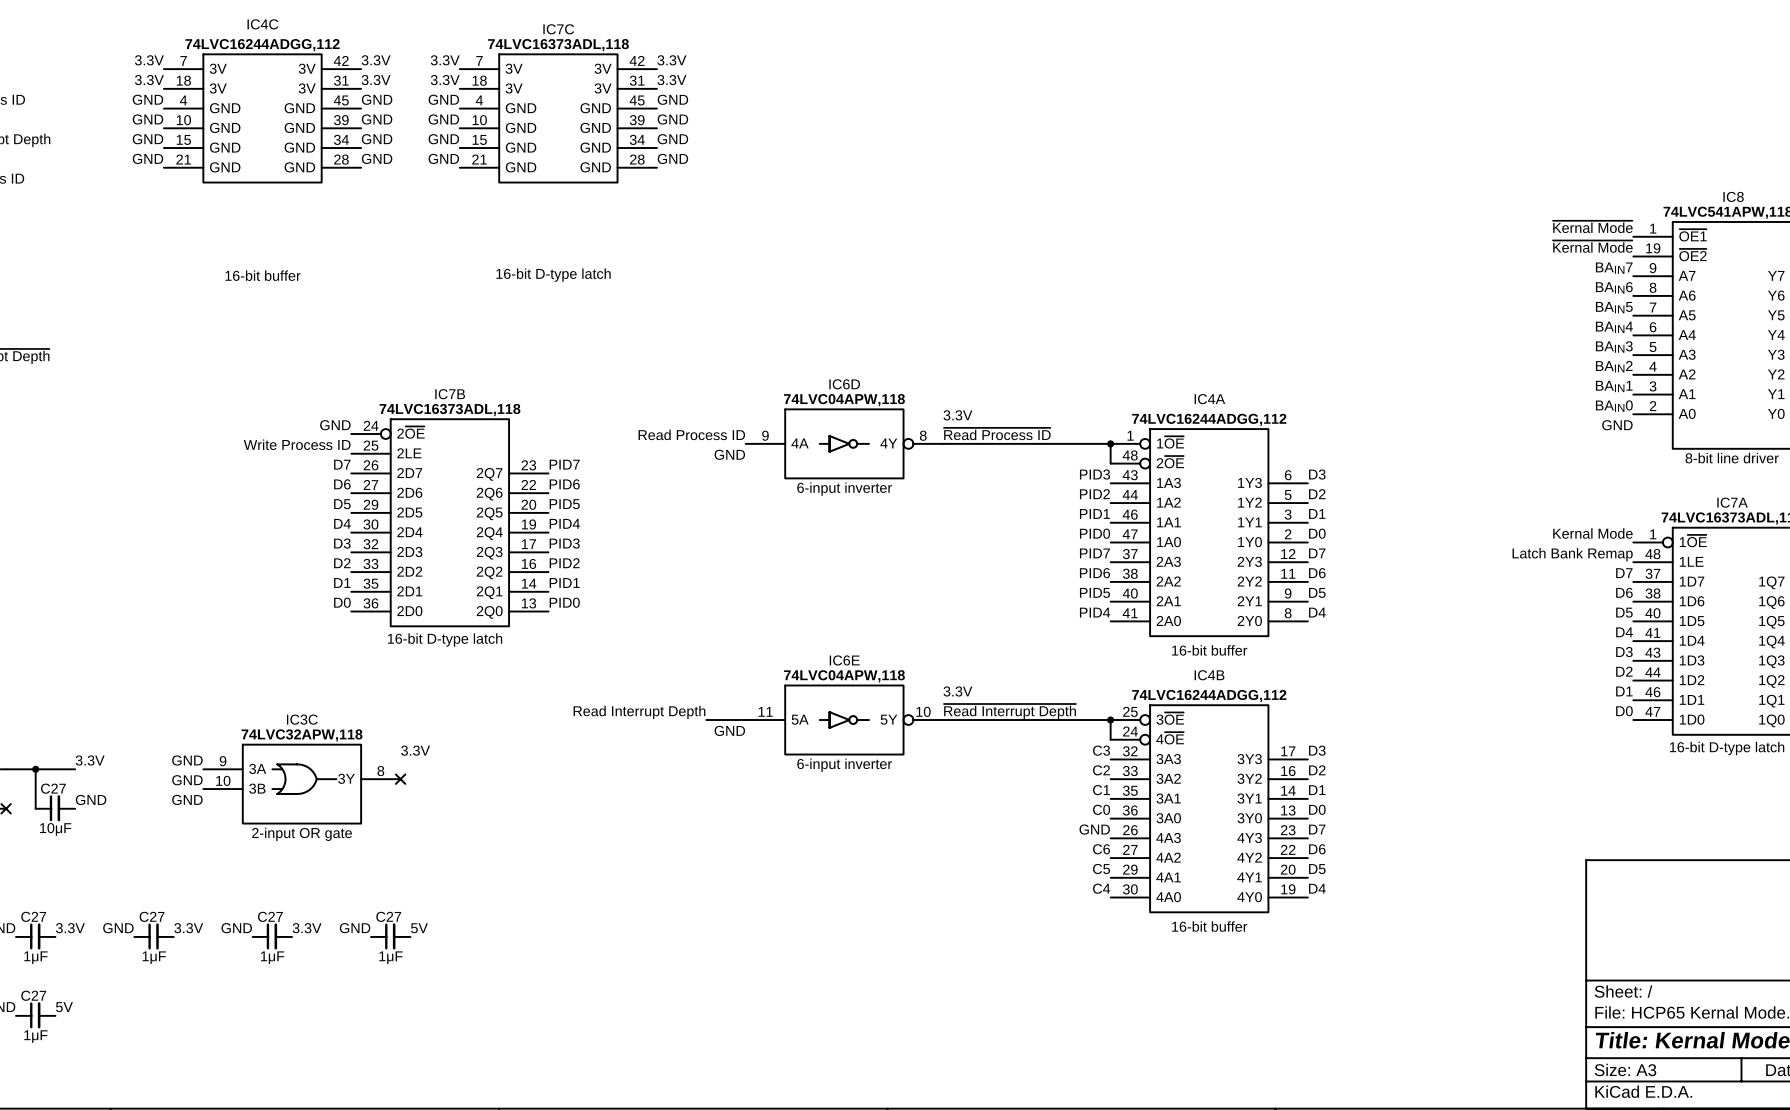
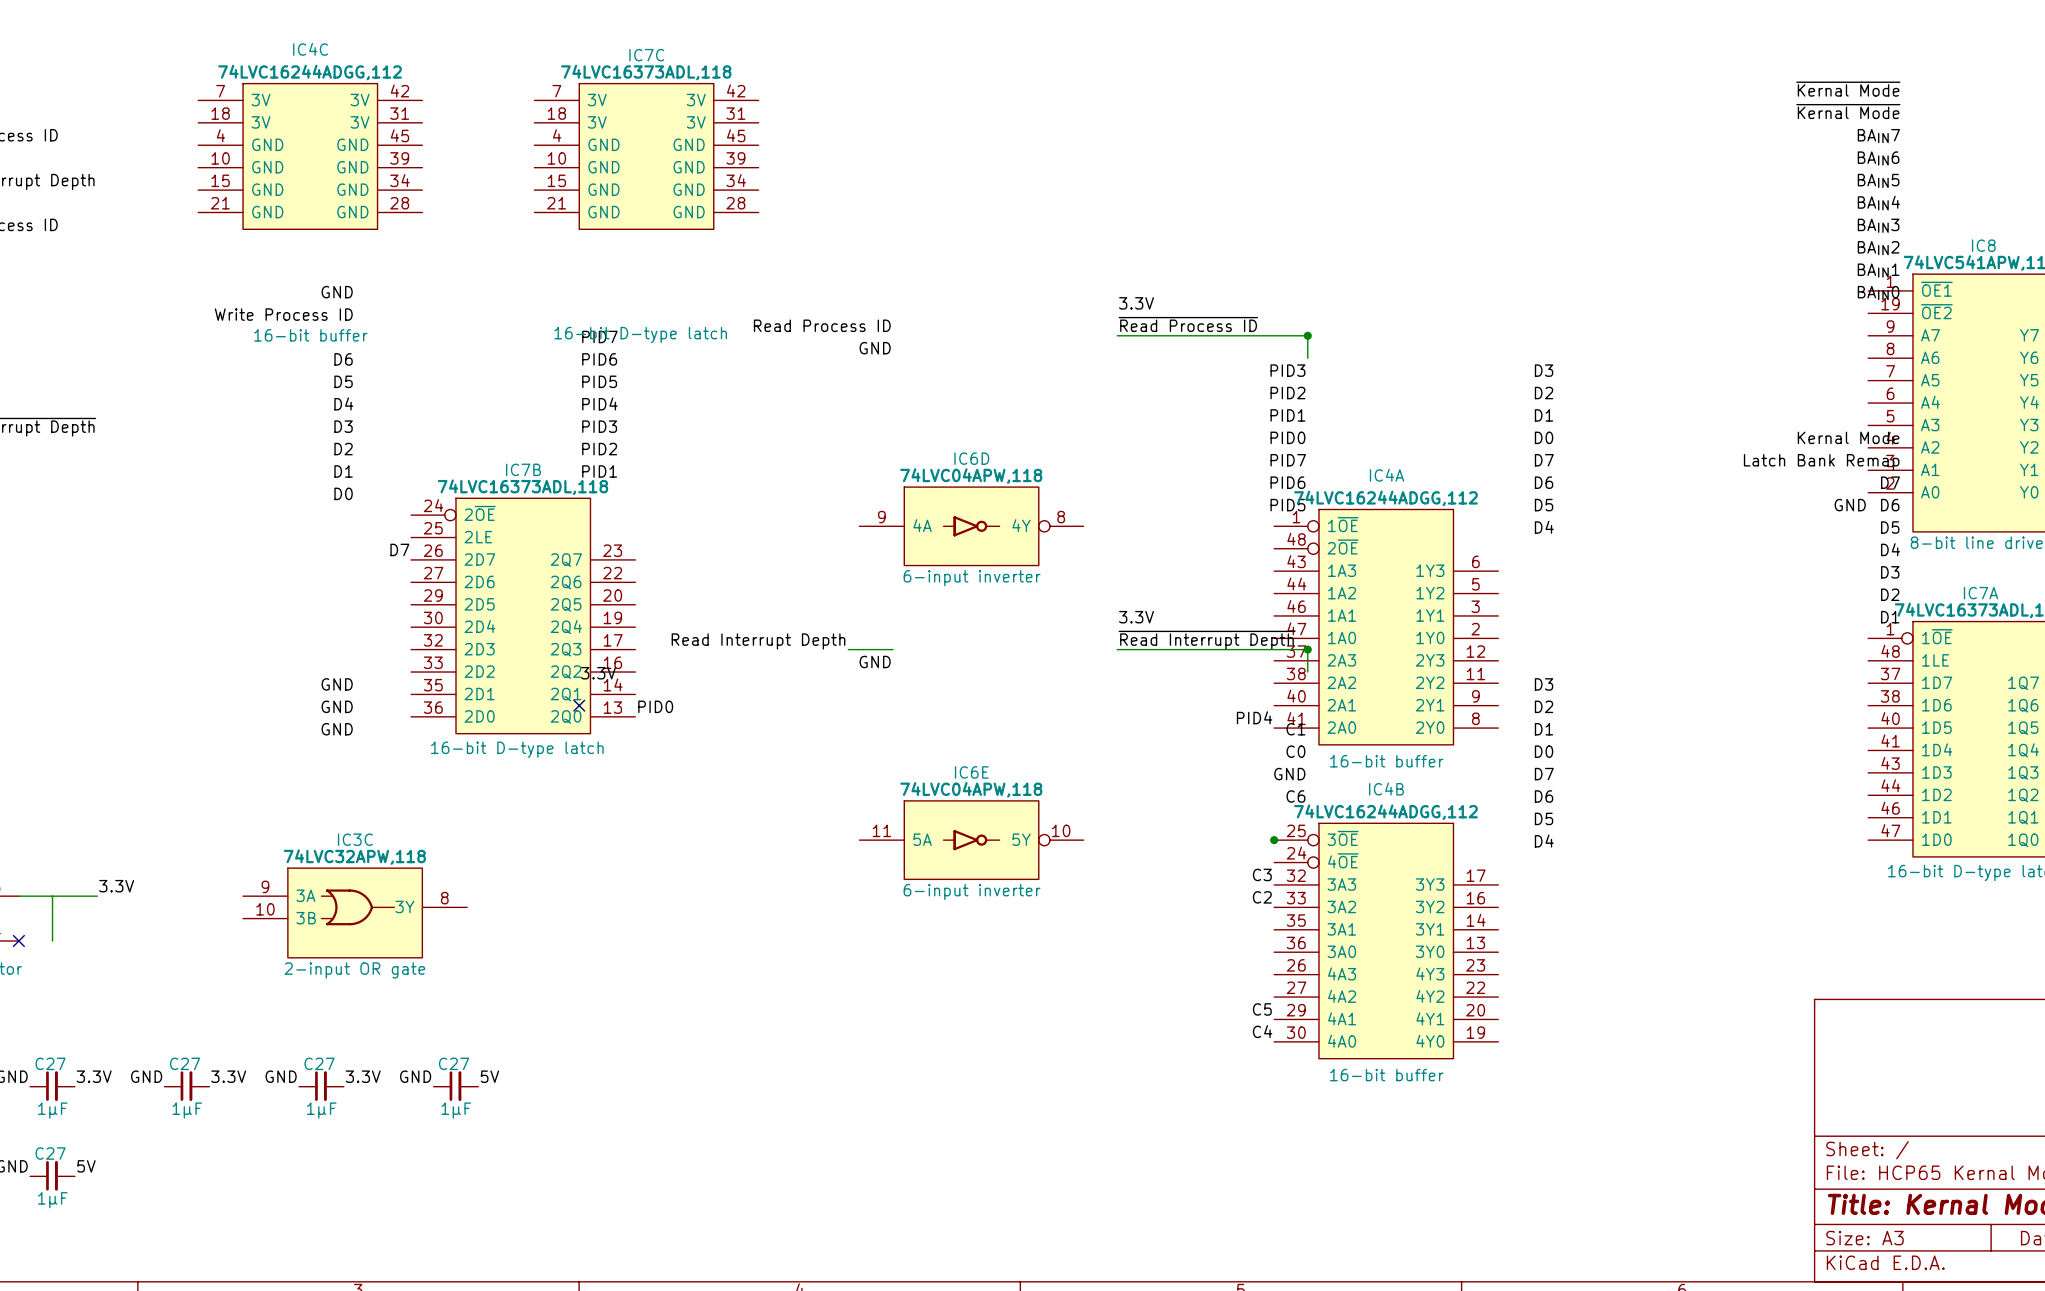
label: none -> ~{Kernal Mode} (1848, 89)
label: 3.3V (149, 60) -> none
label: 3.3V (376, 60) -> none
label: 3.3V (445, 60) -> none
label: 3.3V (671, 60) -> none
label: none -> ~{Kernal Mode} (1848, 111)
label: 3.3V (149, 80) -> none
label: 3.3V (376, 80) -> none
label: 3.3V (445, 80) -> none
label: 3.3V (671, 80) -> none
label: GND (147, 99) -> none
label: GND (377, 99) -> none
label: GND (443, 99) -> none
label: GND (672, 99) -> none
label: GND (147, 119) -> none
label: GND (377, 119) -> none
label: GND (443, 119) -> none
label: GND (672, 119) -> none
label: GND (147, 139) -> none
label: GND (377, 139) -> none
label: GND (443, 139) -> none
label: GND (672, 139) -> none
label: GND (147, 158) -> none
label: GND (377, 158) -> none
label: GND (443, 158) -> none
label: GND (672, 158) -> none
label: ~{Kernal Mode} (1592, 226) -> none
label: none -> GND (337, 292)
label: ~{Kernal Mode} (1592, 246) -> none
label: none -> 3.3V (1136, 303)
label position: BAIN7 (1614, 268) -> BAIN7 (1878, 136)
junction: none -> (1307, 335)
label: none -> GND (875, 348)
label position: BAIN6 (1614, 287) -> BAIN6 (1878, 158)
label: none -> D3 (1544, 370)
label position: BAIN5 (1614, 307) -> BAIN5 (1878, 180)
label: none -> D2 (1544, 393)
label position: BAIN4 (1614, 327) -> BAIN4 (1878, 203)
label: none -> D1 (1544, 415)
label position: BAIN3 (1614, 346) -> BAIN3 (1878, 225)
label: none -> D0 (1544, 437)
label position: BAIN2 (1614, 366) -> BAIN2 (1878, 248)
label: none -> D7 (1544, 460)
label position: BAIN1 (1614, 386) -> BAIN1 (1878, 270)
label: none -> D6 (1544, 482)
label: none -> D7 (1890, 482)
label position: BAIN0 (1614, 406) -> BAIN0 (1878, 292)
label: 3.3V (957, 415) -> none
label: GND (335, 425) -> none
label: none -> D5 (1544, 505)
label: none -> D6 (1890, 505)
label position: Read Process ID (691, 434) -> Read Process ID (822, 325)
label position: ~{Read Process ID} (997, 434) -> ~{Read Process ID} (1188, 324)
wire: (942, 443) (1110, 443) (1110, 463) -> (1117, 335) (1307, 335) (1307, 358)
junction: (1110, 443) -> none
label position: Write Process ID (297, 444) -> Write Process ID (283, 314)
label: none -> D4 (1544, 527)
label: none -> D5 (1890, 527)
label: GND (729, 454) -> none
label position: PID7 (564, 464) -> PID7 (599, 336)
label: none -> D4 (1890, 549)
label position: PID3 (1094, 474) -> PID3 (1287, 370)
label: D3 (1317, 474) -> none
label position: D6 (342, 484) -> D6 (343, 359)
label position: PID6 (564, 484) -> PID6 (599, 359)
label: none -> D3 (1890, 572)
label position: PID2 (1094, 494) -> PID2 (1287, 393)
label: D2 (1317, 494) -> none
label position: D5 (342, 504) -> D5 (343, 381)
label position: PID5 (564, 504) -> PID5 (599, 381)
label: none -> D2 (1890, 594)
label position: PID1 (1094, 513) -> PID1 (1287, 415)
label: D1 (1317, 513) -> none
label position: D4 (342, 523) -> D4 (343, 403)
label position: PID4 (564, 523) -> PID4 (599, 403)
label: none -> 3.3V (1136, 617)
label: none -> D1 (1890, 617)
label position: PID0 (1095, 533) -> PID0 (1287, 437)
label: D0 (1317, 533) -> none
label position: Kernal Mode (1592, 533) -> Kernal Mode (1848, 437)
label position: D3 (342, 543) -> D3 (343, 426)
label position: PID3 (564, 543) -> PID3 (599, 426)
junction: none -> (1307, 649)
label position: PID7 (1094, 553) -> PID7 (1288, 460)
label: D7 (1317, 553) -> none
label position: Latch Bank Remap (1572, 554) -> Latch Bank Remap (1821, 462)
label position: D2 (342, 563) -> D2 (343, 449)
label position: PID2 (564, 563) -> PID2 (599, 449)
label: none -> GND (875, 662)
label: none -> 3.3V (598, 673)
label position: PID6 (1094, 573) -> PID6 (1287, 482)
label: D6 (1317, 573) -> none
label: D7 (1624, 573) -> none
label: none -> GND (337, 684)
label position: D1 (342, 583) -> D1 (343, 471)
label position: PID1 (564, 583) -> PID1 (599, 471)
label: none -> D3 (1544, 684)
label position: PID5 (1094, 592) -> PID5 (1287, 505)
label: D5 (1317, 592) -> none
label: D6 (1624, 592) -> none
no-connect mark: none -> (579, 705)
label: none -> GND (337, 706)
label position: D0 (342, 602) -> D0 (343, 493)
label: none -> D2 (1544, 706)
label: D4 (1317, 612) -> none
label: D5 (1624, 612) -> none
label: none -> GND (337, 729)
label: none -> D1 (1544, 729)
label: D4 (1624, 632) -> none
label: none -> D0 (1544, 751)
label: D3 (1624, 652) -> none
label: none -> D7 (1544, 774)
label: D2 (1624, 671) -> none
label: none -> D6 (1544, 796)
label: 3.3V (957, 691) -> none
label: D1 (1624, 691) -> none
label: none -> D5 (1544, 818)
label position: ~{Read Interrupt Depth} (1009, 711) -> ~{Read Interrupt Depth} (1206, 640)
label: D0 (1624, 711) -> none
label position: Read Interrupt Depth (639, 712) -> Read Interrupt Depth (758, 641)
wire: (706, 720) (745, 720) -> (848, 649) (893, 649)
wire: (942, 720) (1110, 720) (1110, 739) -> (1117, 649) (1307, 649) (1307, 672)
label: none -> D4 (1544, 841)
label: GND (729, 730) -> none
label: 3.3V (415, 750) -> none
label: D3 (1317, 750) -> none
label: GND (187, 760) -> none
junction: (35, 769) -> none
label: D2 (1317, 770) -> none
no-connect mark: (400, 779) -> none
label: GND (187, 780) -> none
label position: C1 (1101, 790) -> C1 (1295, 729)
label: D1 (1317, 790) -> none
label: GND (91, 799) -> none
label: GND (187, 799) -> none
C27: 10μF (55, 808) -> none
label position: C0 (1101, 809) -> C0 (1295, 751)
label: D0 (1317, 809) -> none
label position: GND (1094, 829) -> GND (1289, 774)
label: D7 (1317, 829) -> none
label position: C6 (1101, 849) -> C6 (1295, 796)
label: D6 (1317, 849) -> none
label: D5 (1317, 869) -> none
label: D4 (1317, 888) -> none

